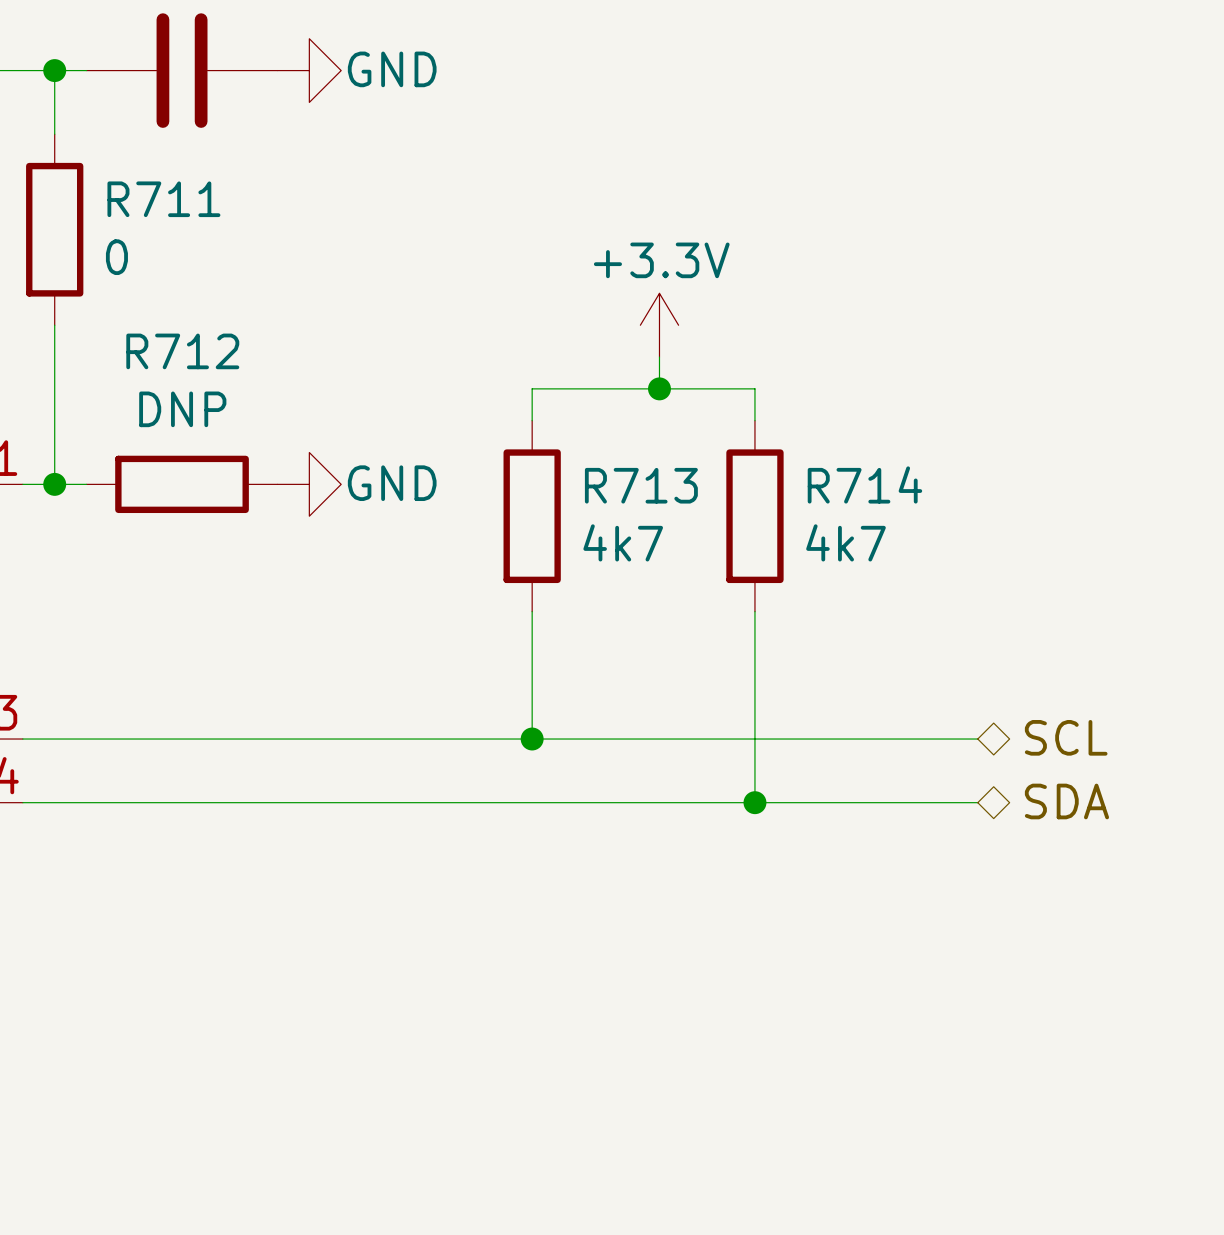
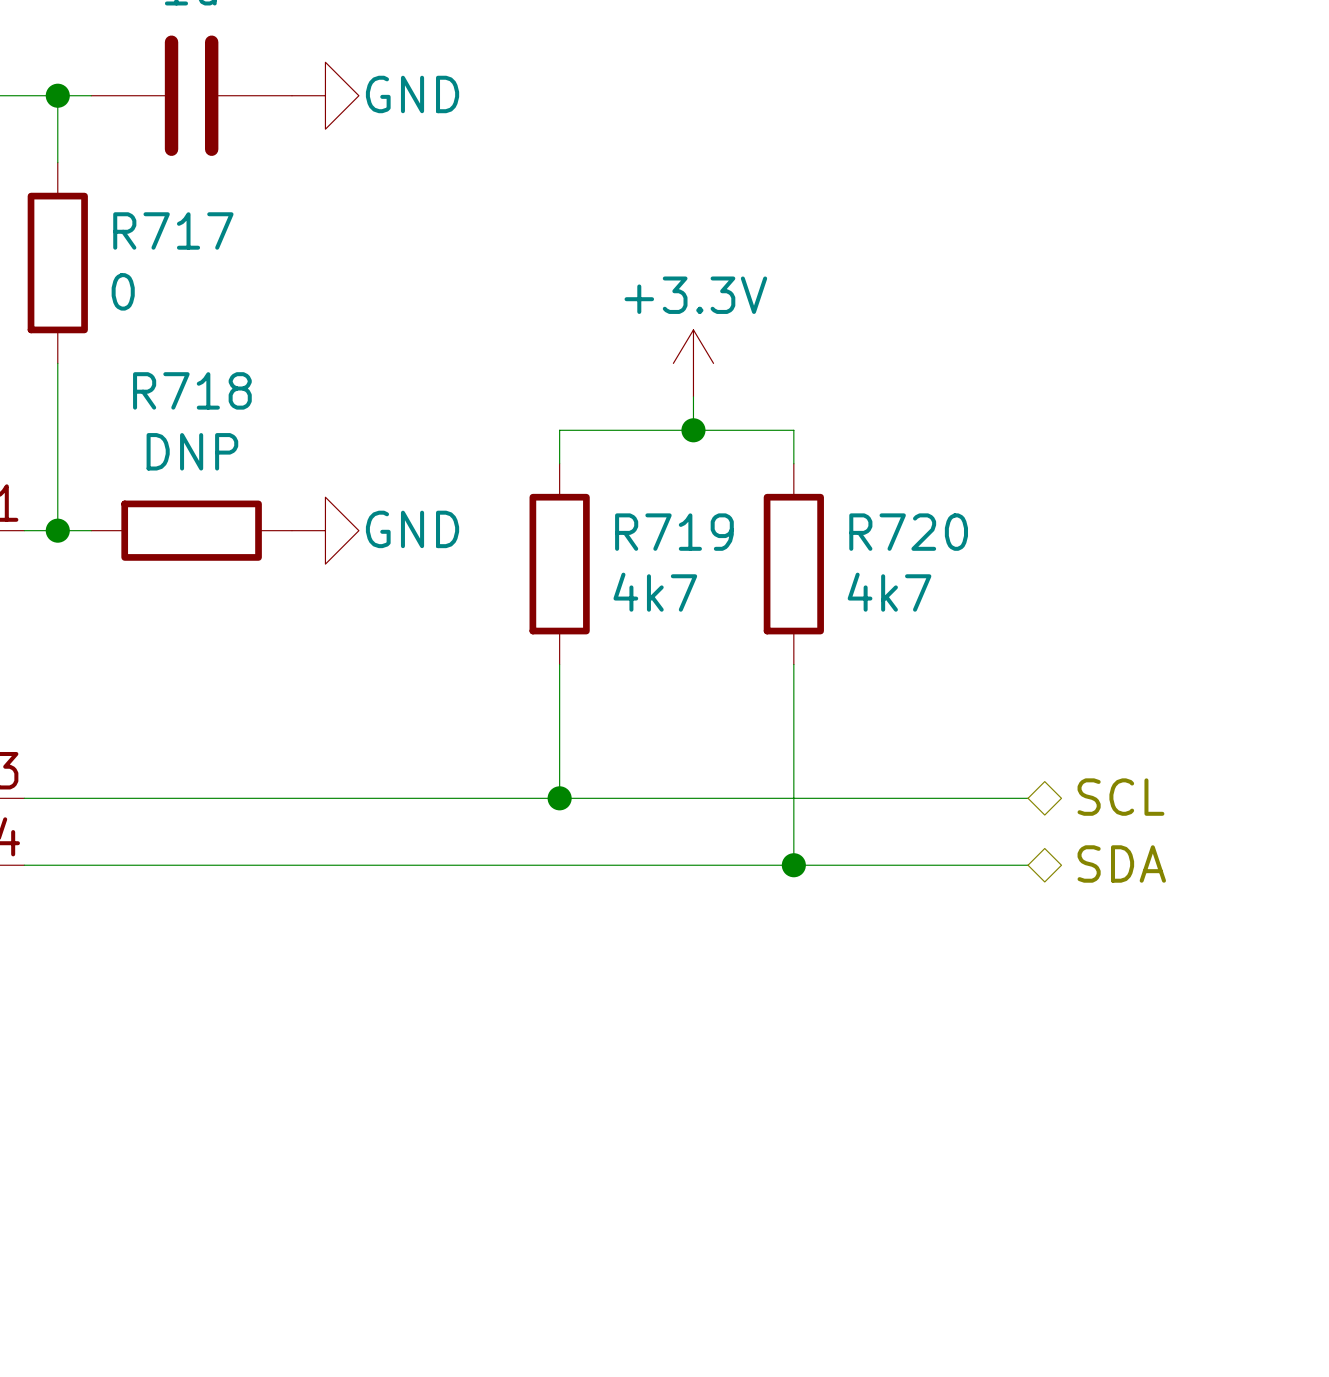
R711 name: R711 (163, 199) -> R717 (173, 230)
R712 name: R712 (182, 351) -> R718 (192, 390)
R714 name: R714 (864, 484) -> R720 (908, 532)
R713 name: R713 (641, 485) -> R719 (674, 532)

